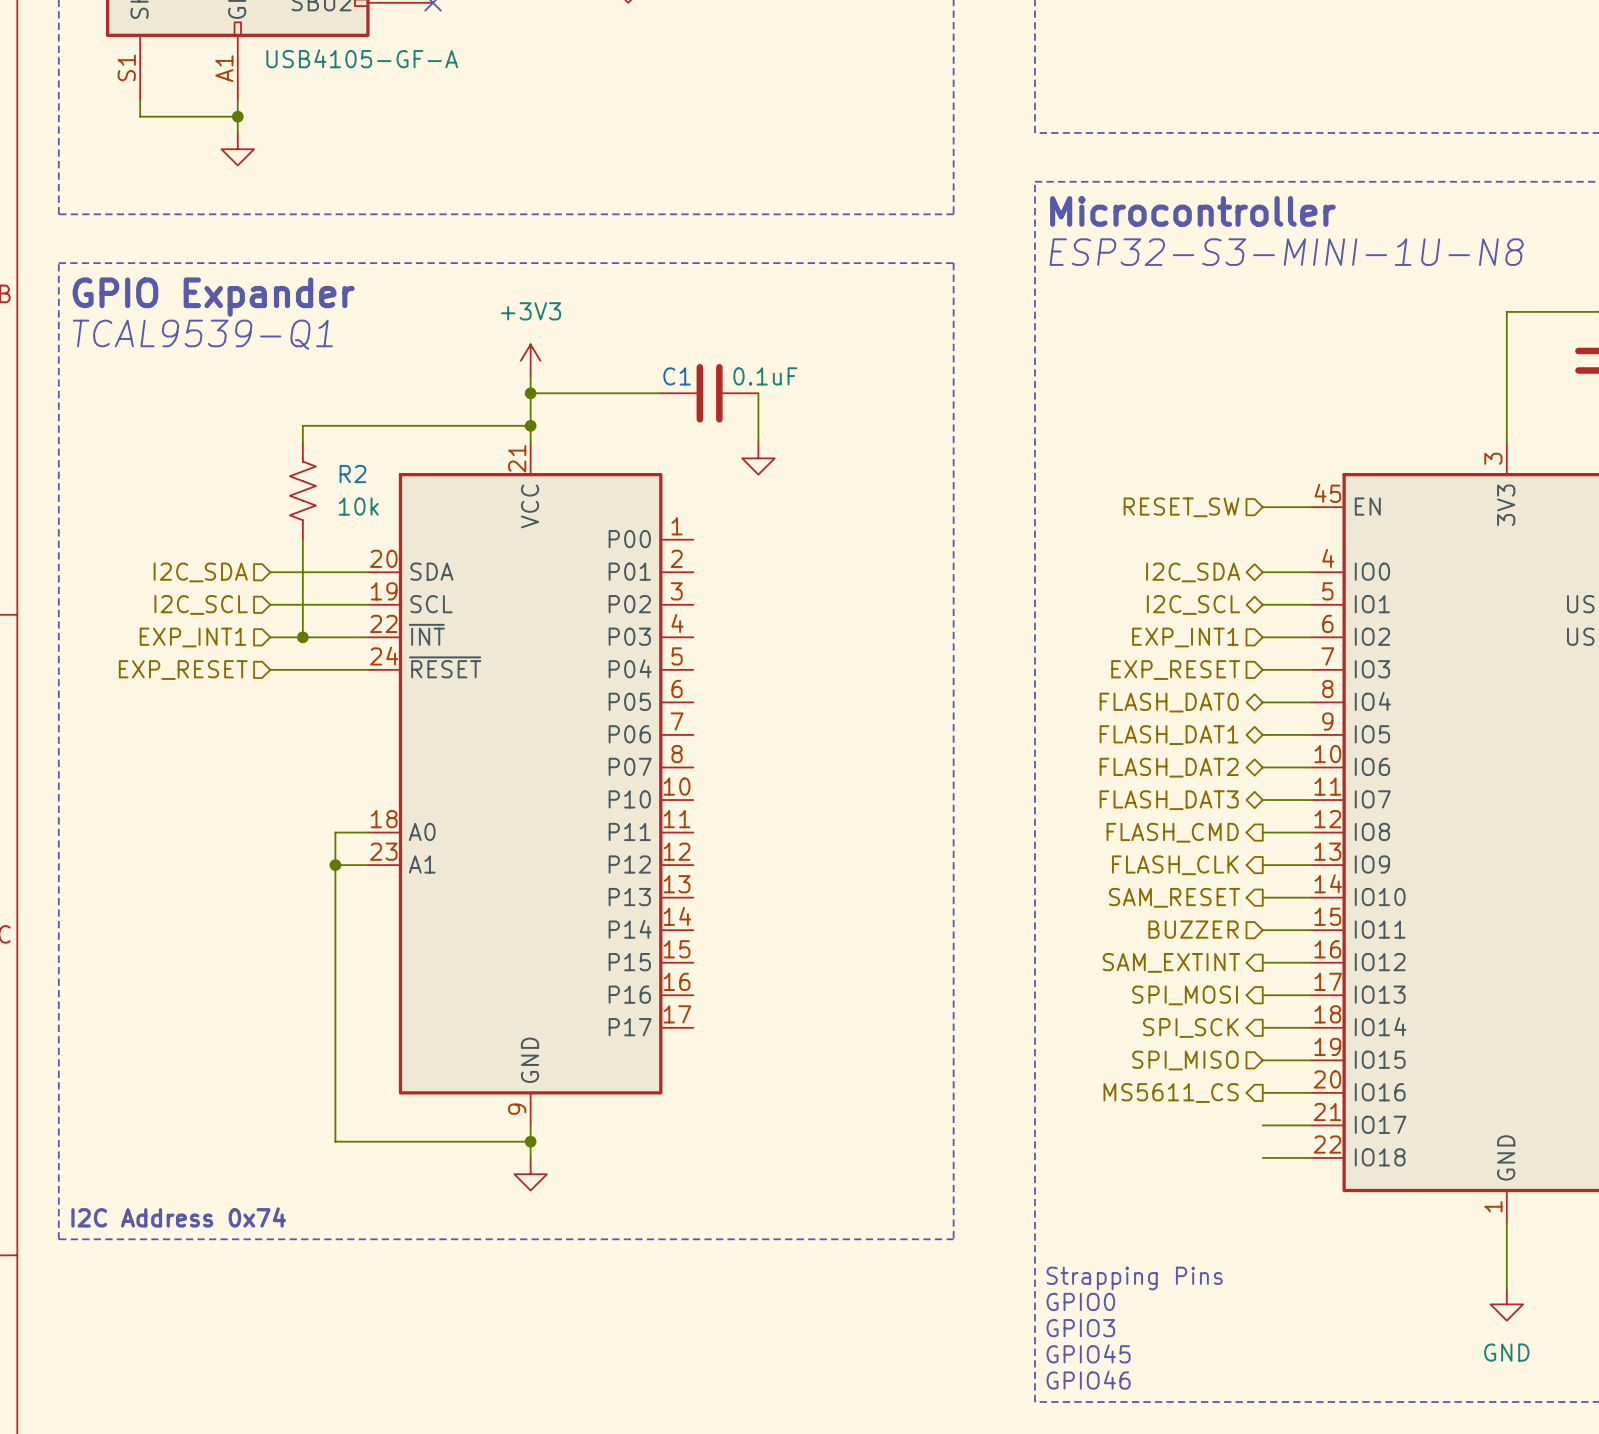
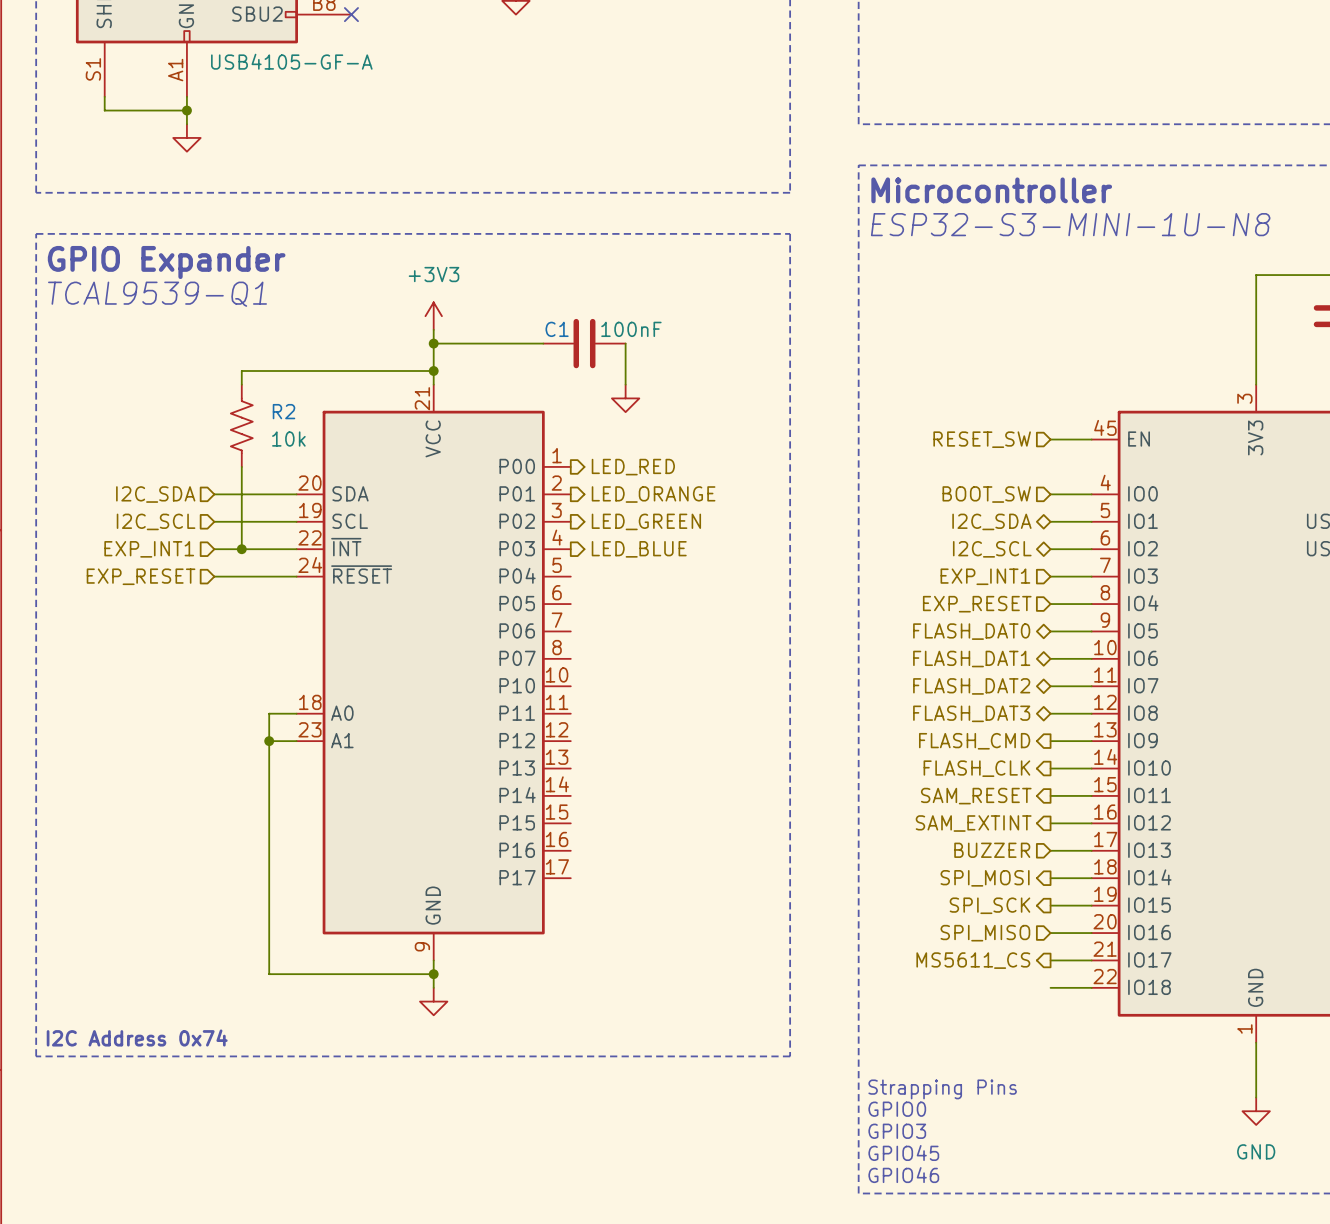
C1 value: 0.1uF (765, 376) -> 100nF (631, 329)
hierarchical label: none -> LED_RED (633, 467)
hierarchical label: none -> LED_ORANGE (653, 494)
hierarchical label shape: bidirectional (1193, 572) -> input (986, 494)
hierarchical label: I2C_SDA (1193, 572) -> BOOT_SW (986, 494)
hierarchical label: none -> LED_GREEN (646, 521)
hierarchical label: I2C_SCL (1193, 604) -> I2C_SDA (991, 521)
hierarchical label: none -> LED_BLUE (639, 549)
hierarchical label shape: input (1185, 637) -> bidirectional (992, 549)
hierarchical label: EXP_INT1 (1185, 637) -> I2C_SCL (992, 549)
hierarchical label: EXP_RESET (1175, 670) -> EXP_INT1 (985, 576)
hierarchical label shape: bidirectional (1169, 702) -> input (977, 604)
hierarchical label: FLASH_DAT0 (1169, 702) -> EXP_RESET (977, 604)
hierarchical label: FLASH_DAT1 (1169, 735) -> FLASH_DAT0 (971, 631)
hierarchical label: FLASH_DAT2 (1169, 767) -> FLASH_DAT1 (971, 659)
hierarchical label: FLASH_DAT3 (1169, 800) -> FLASH_DAT2 (971, 686)
hierarchical label shape: output (1172, 832) -> bidirectional (971, 713)
hierarchical label: FLASH_CMD (1172, 832) -> FLASH_DAT3 (971, 713)
hierarchical label: FLASH_CLK (1175, 865) -> FLASH_CMD (974, 741)
hierarchical label: SAM_RESET (1174, 897) -> FLASH_CLK (976, 768)
hierarchical label shape: input (1193, 929) -> output (976, 796)
hierarchical label: BUZZER (1193, 929) -> SAM_RESET (976, 796)
hierarchical label shape: output (1185, 995) -> input (992, 850)
hierarchical label: SPI_MOSI (1185, 995) -> BUZZER (992, 850)
hierarchical label: SPI_SCK (1190, 1027) -> SPI_MOSI (985, 878)
hierarchical label shape: input (1185, 1060) -> output (989, 905)
hierarchical label: SPI_MISO (1185, 1060) -> SPI_SCK (989, 905)
hierarchical label shape: output (1171, 1093) -> input (985, 933)
hierarchical label: MS5611_CS (1171, 1093) -> SPI_MISO (985, 933)
hierarchical label: none -> MS5611_CS (973, 960)

